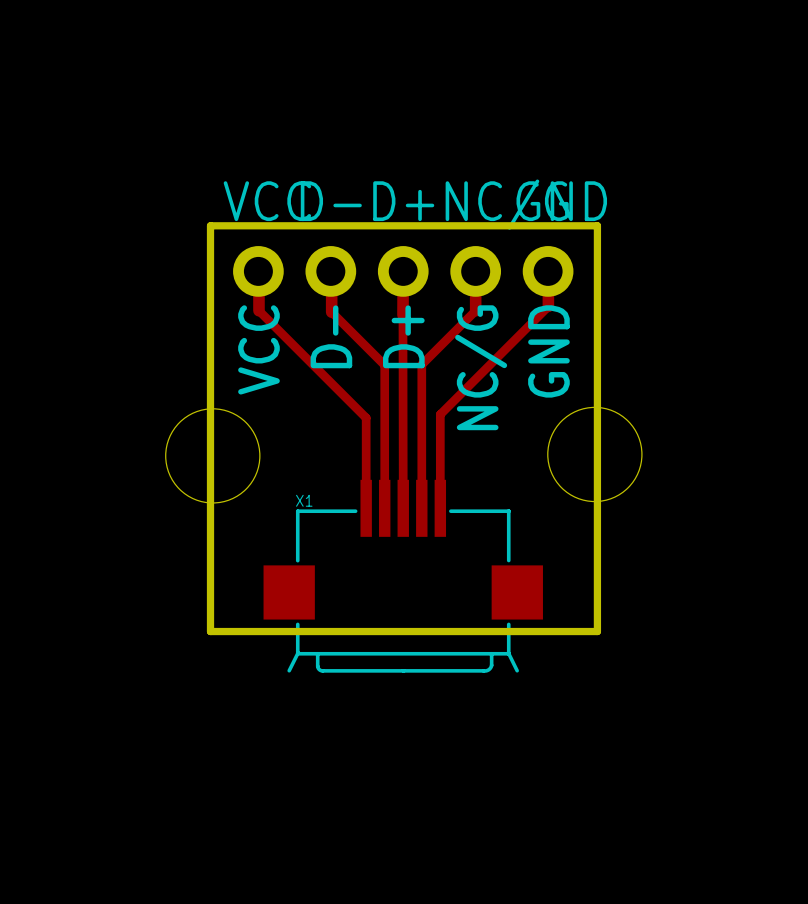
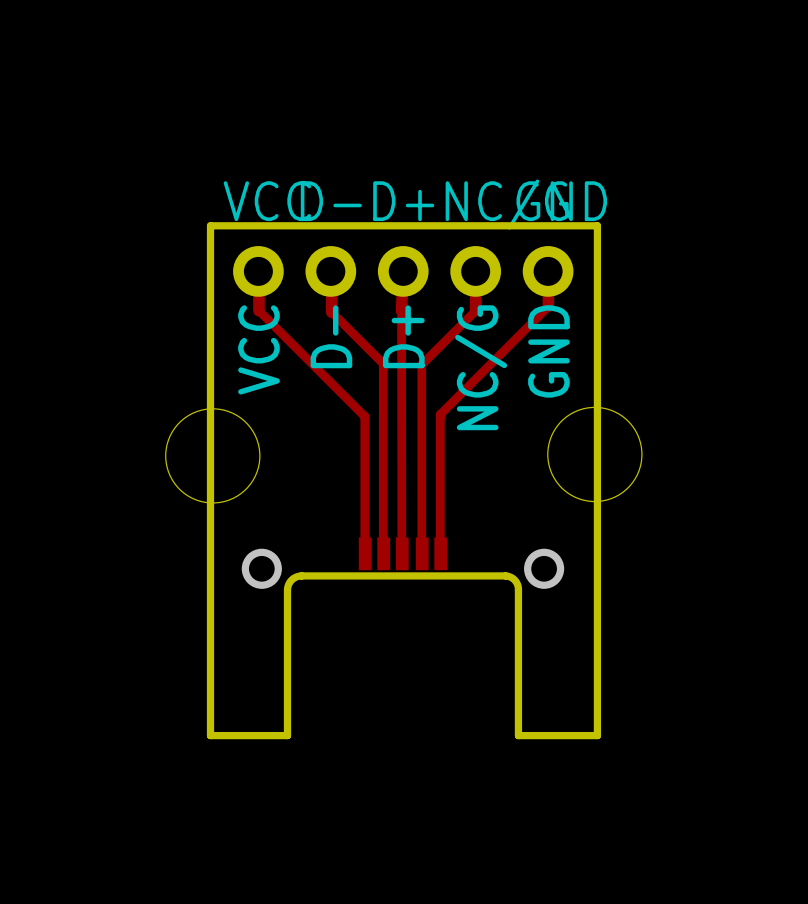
track: (403, 271) (403, 508) -> (403, 271) (401, 310) (401, 542)
track: (383, 363) (384, 508) -> (383, 363) (383, 542)
track: (364, 416) (366, 508) -> (364, 416) (364, 541)
track: none -> (421, 508) (421, 541)
track: none -> (440, 508) (440, 541)
drawing: none -> [358, 537, 448, 571]
via: none -> (261, 568)
via: none -> (544, 568)
X1: (403, 576) -> none
board edge: (210, 631) (597, 631) -> (210, 631) (210, 735) (287, 735) (287, 588) (291, 580) (298, 576) (505, 575) (512, 578) (518, 588) (518, 735) (597, 735) (597, 631)

